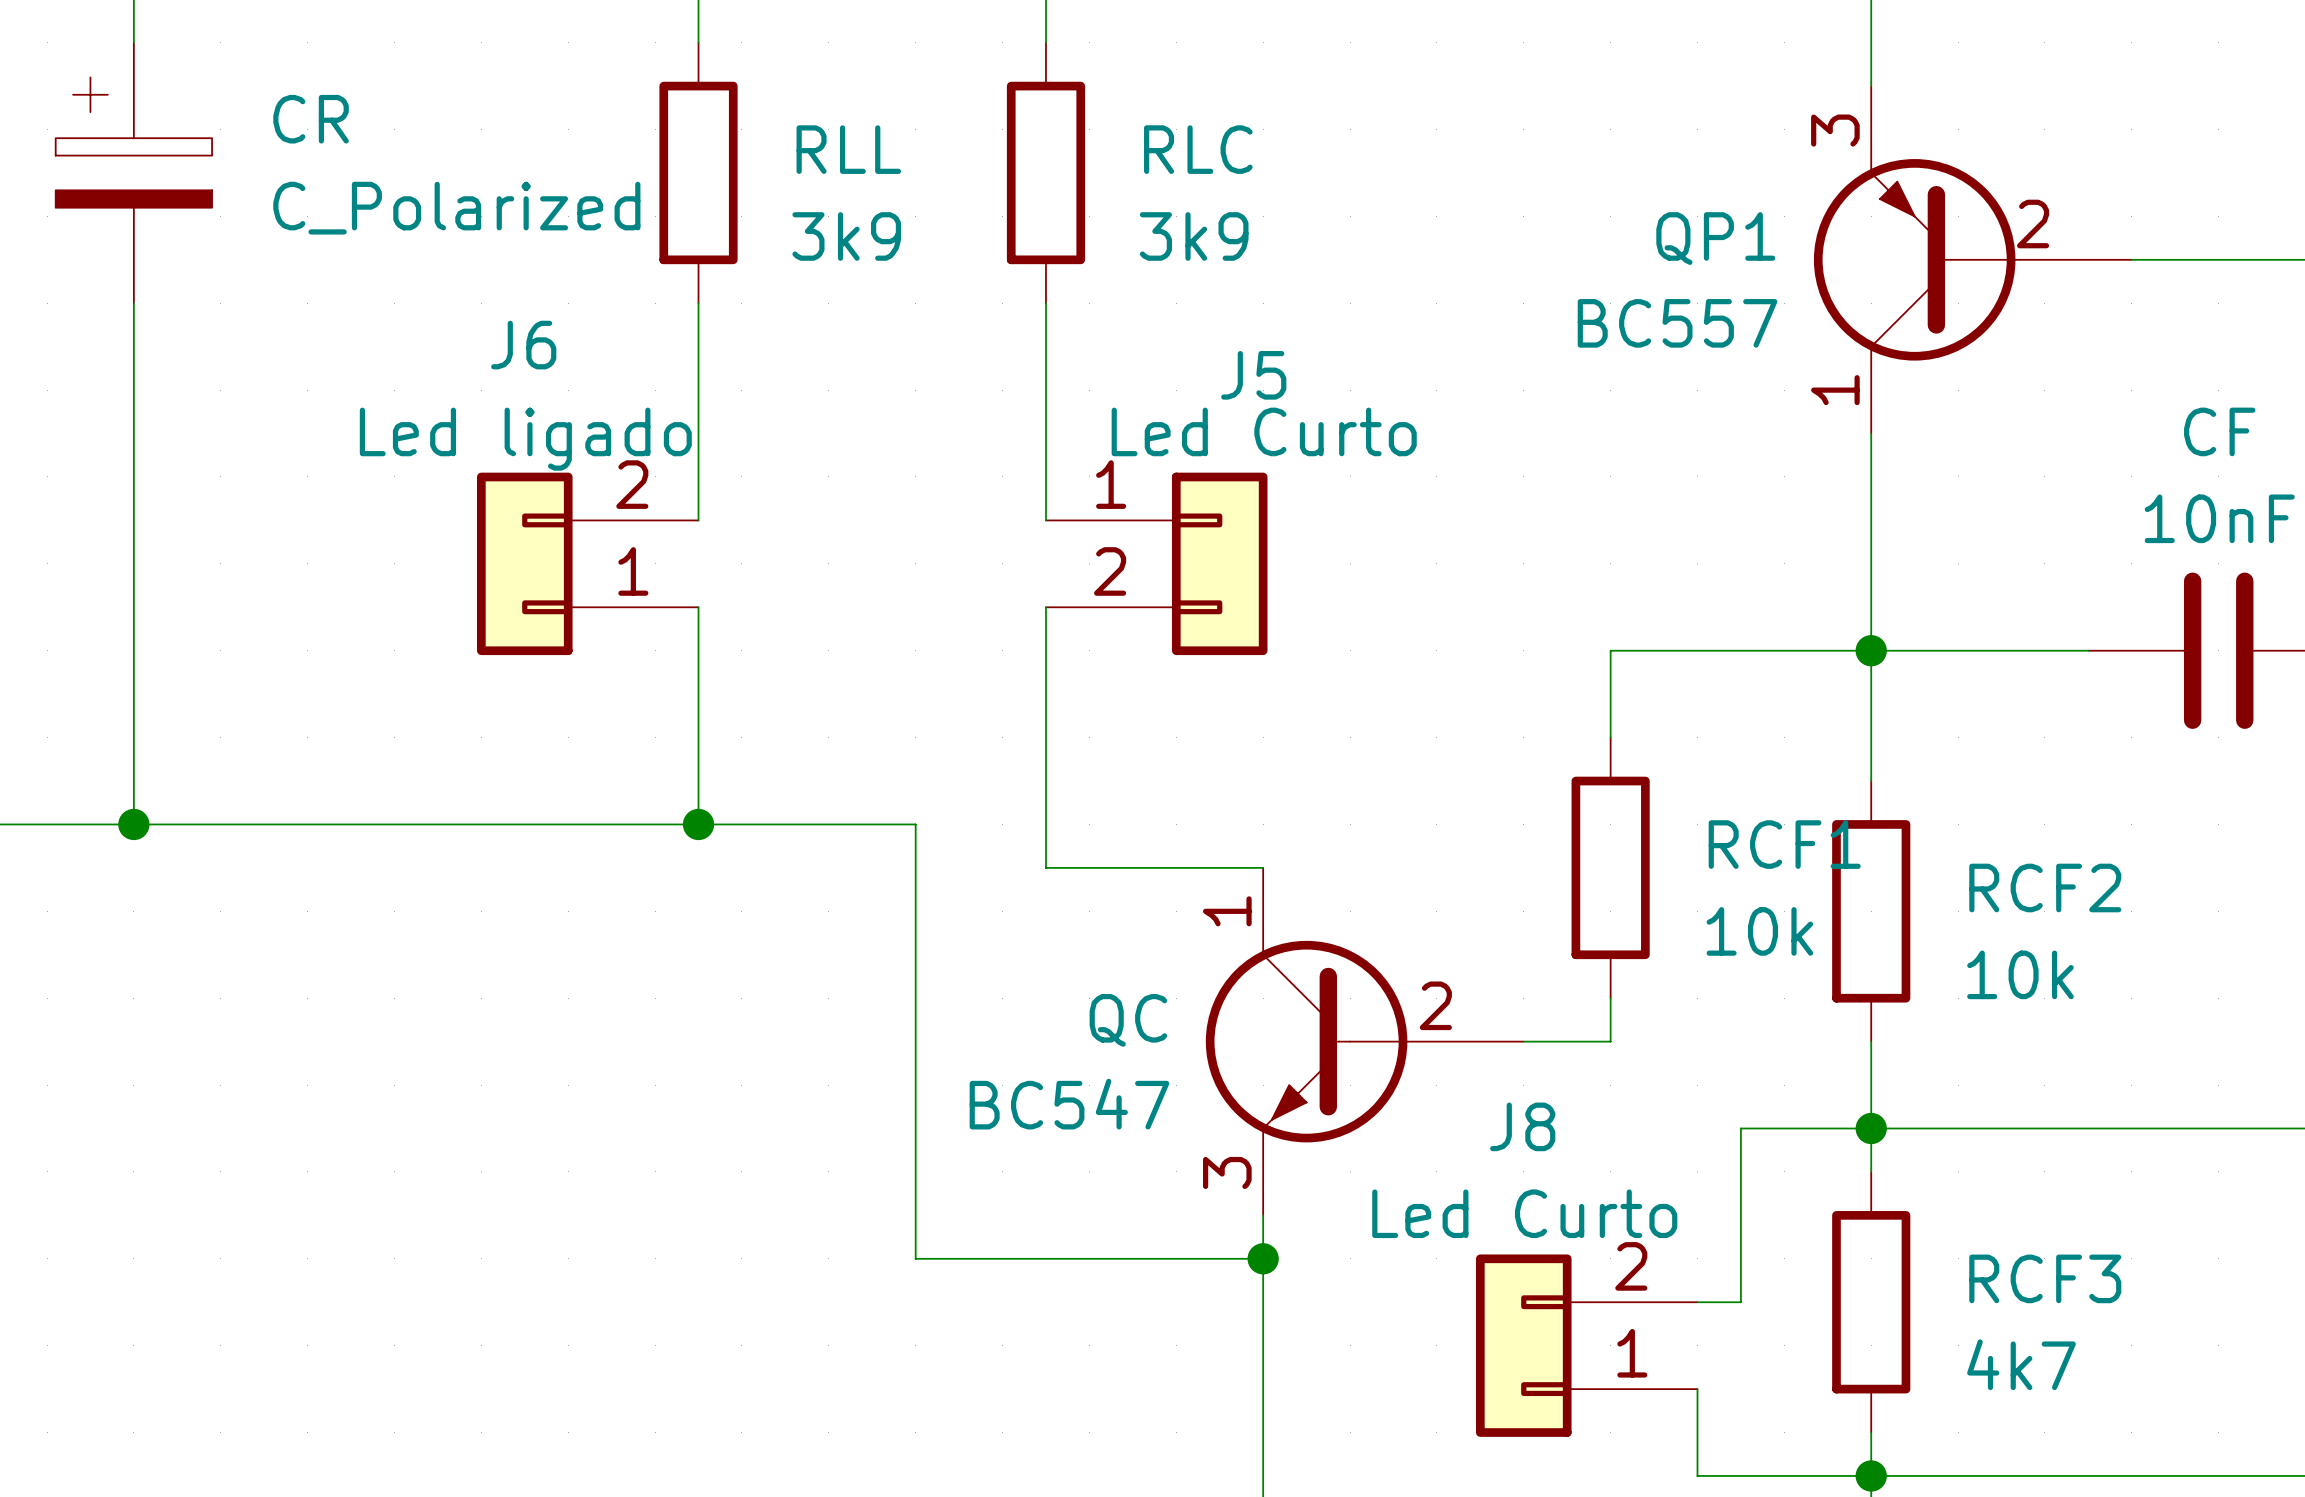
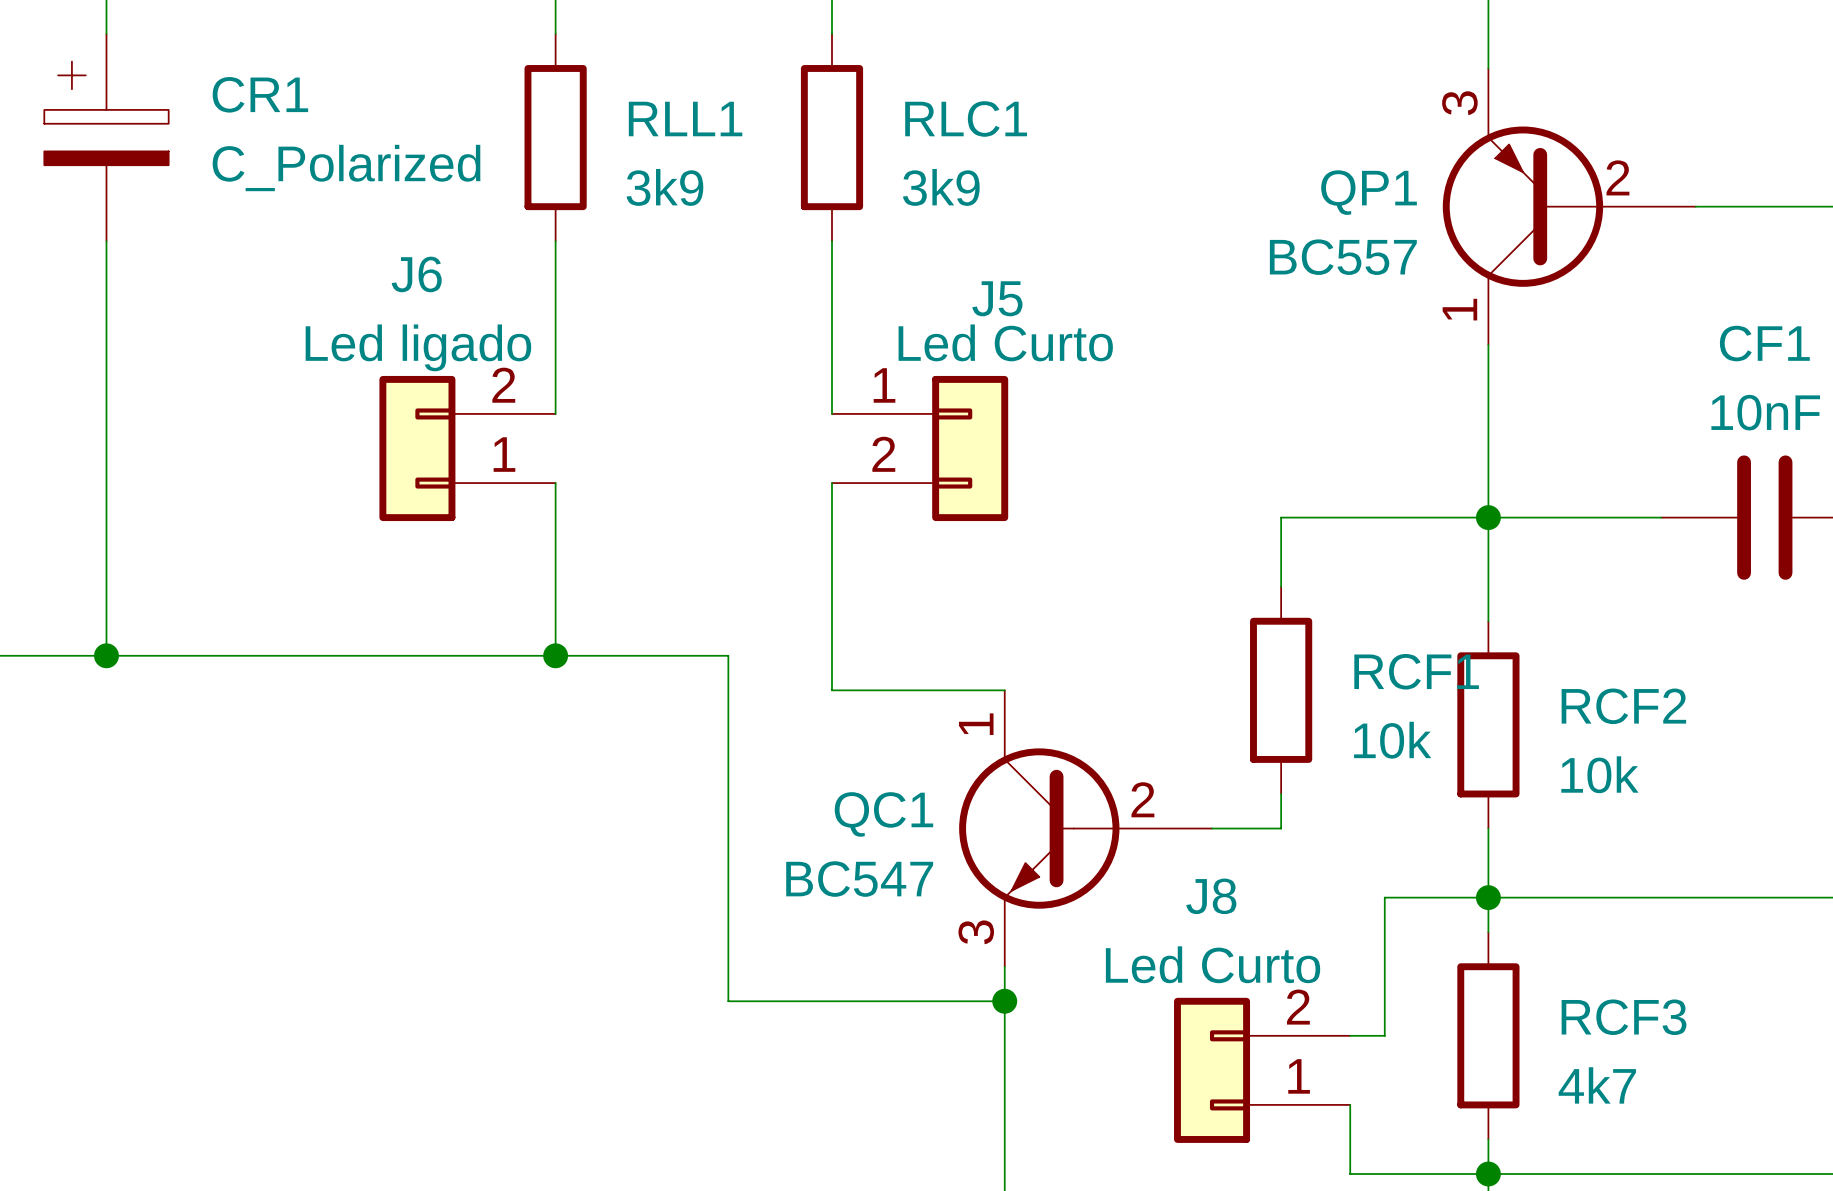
CR name: CR (311, 119) -> CR1 (260, 94)
RLL name: RLL (848, 149) -> RLL1 (685, 119)
RLC name: RLC (1198, 149) -> RLC1 (966, 118)
CF name: CF (2219, 431) -> CF1 (1764, 343)
QC name: QC (1128, 1020) -> QC1 (883, 814)

